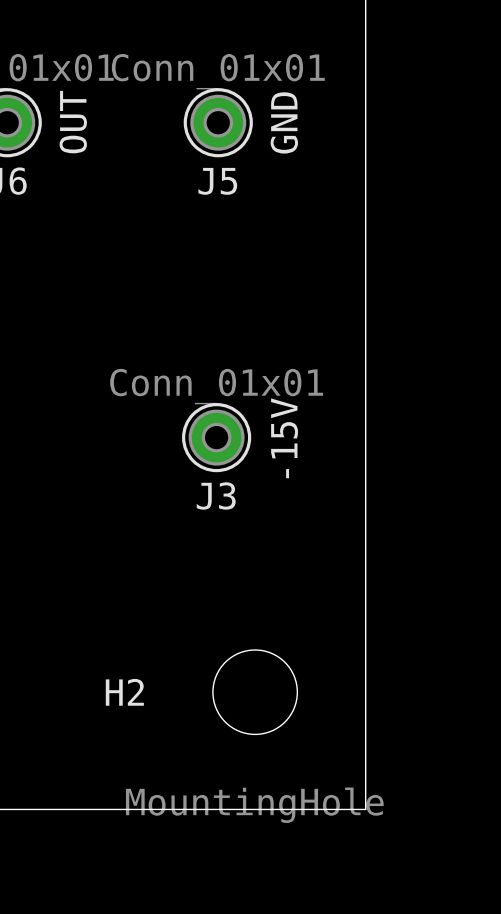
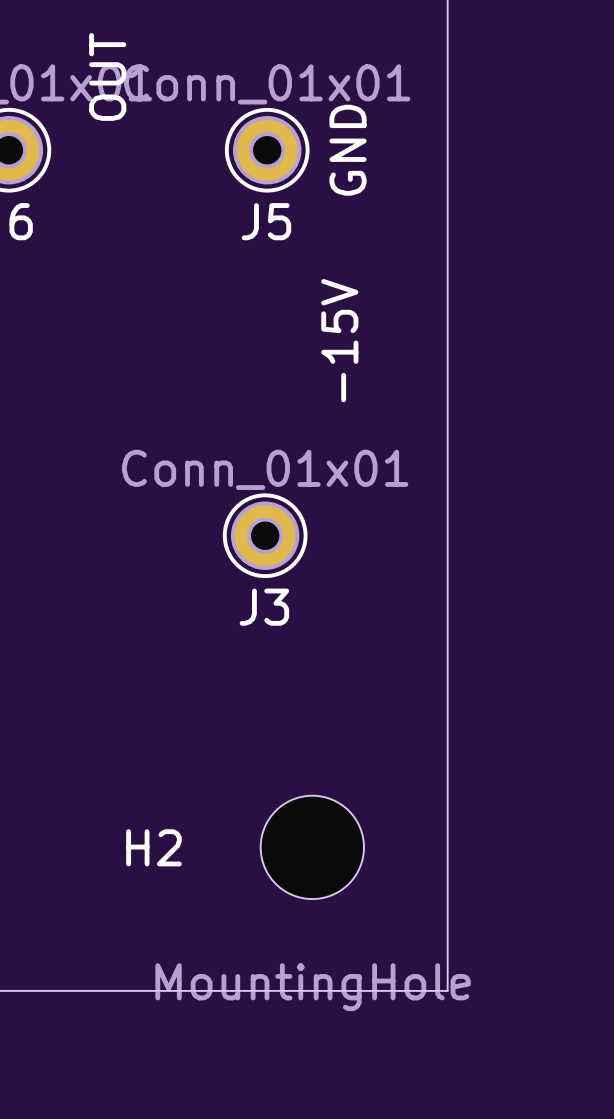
text position: OUT (73, 122) -> OUT (107, 76)
text position: -15V (284, 438) -> -15V (339, 340)

